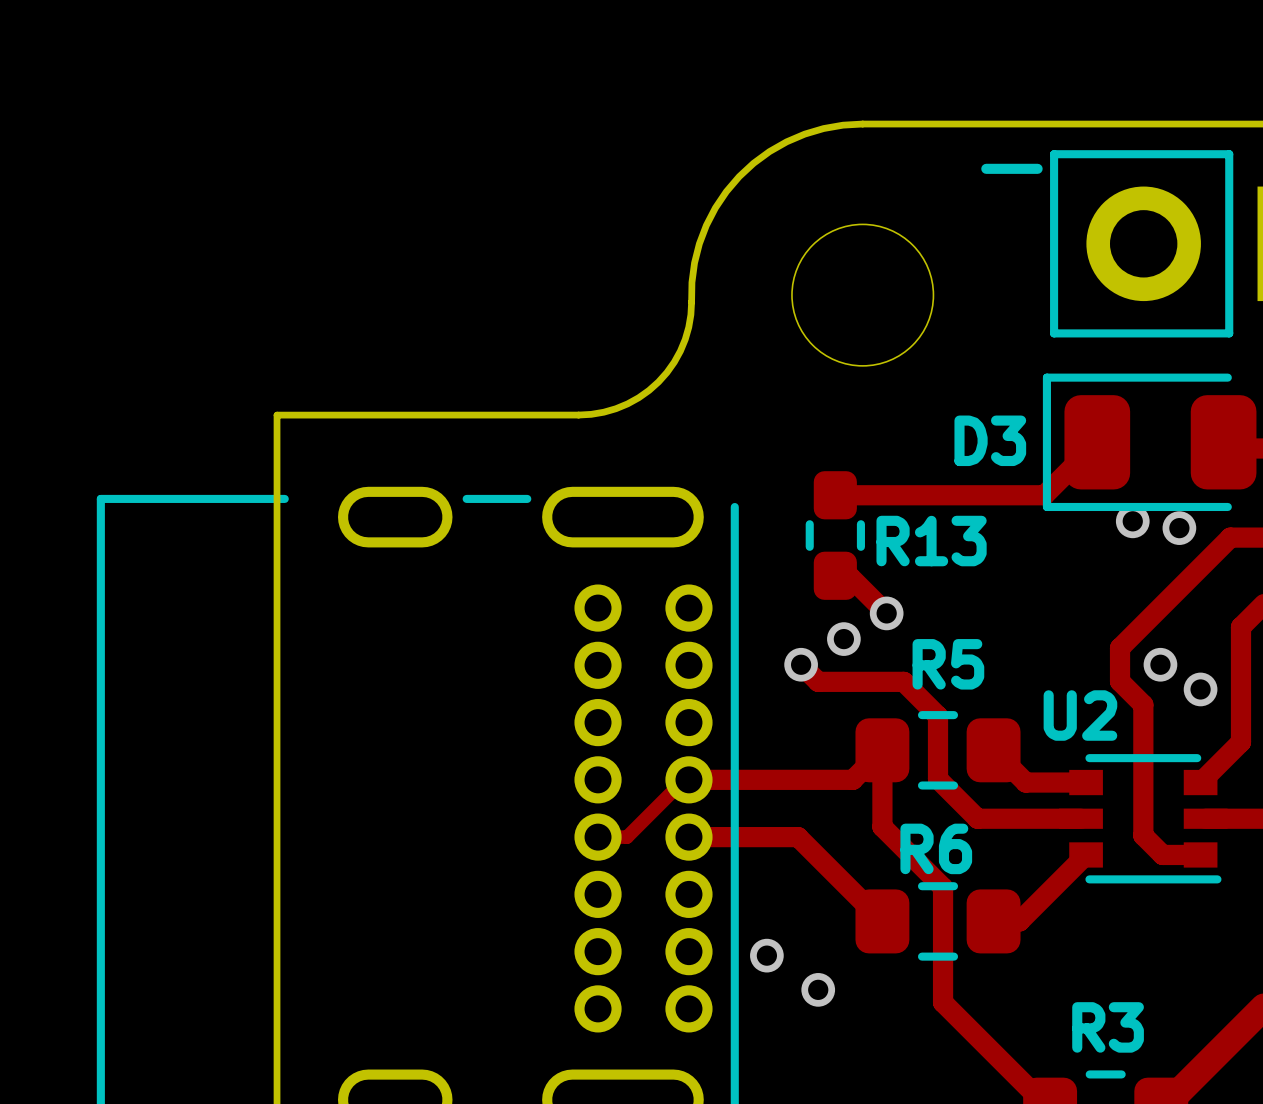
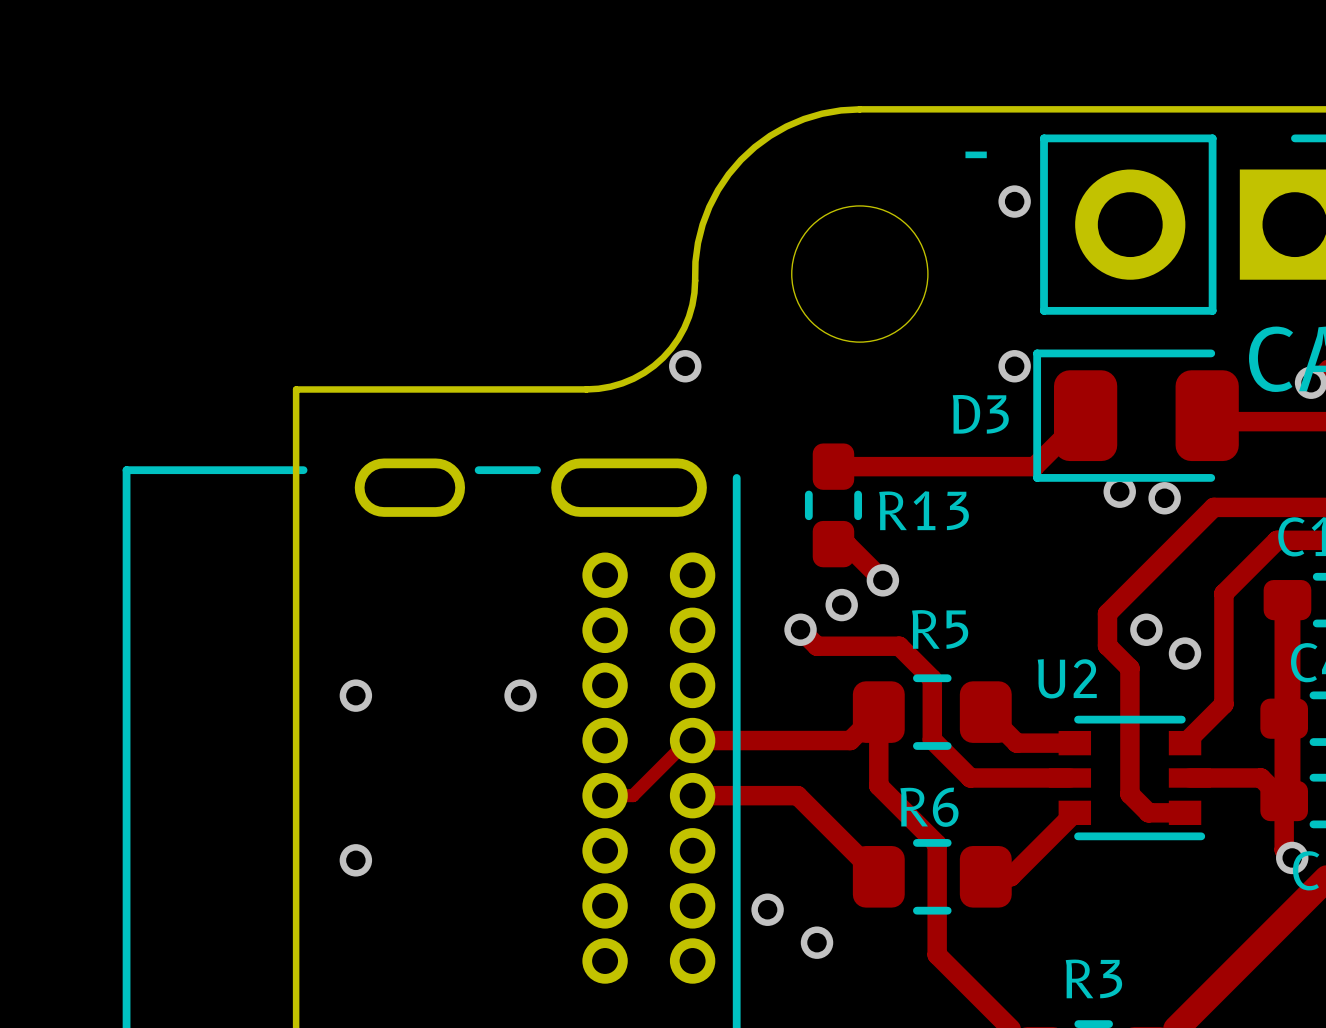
via: none -> (1014, 201)
via: none -> (685, 366)
via: none -> (1014, 366)
via: none -> (355, 695)
via: none -> (520, 695)
via: none -> (355, 860)

